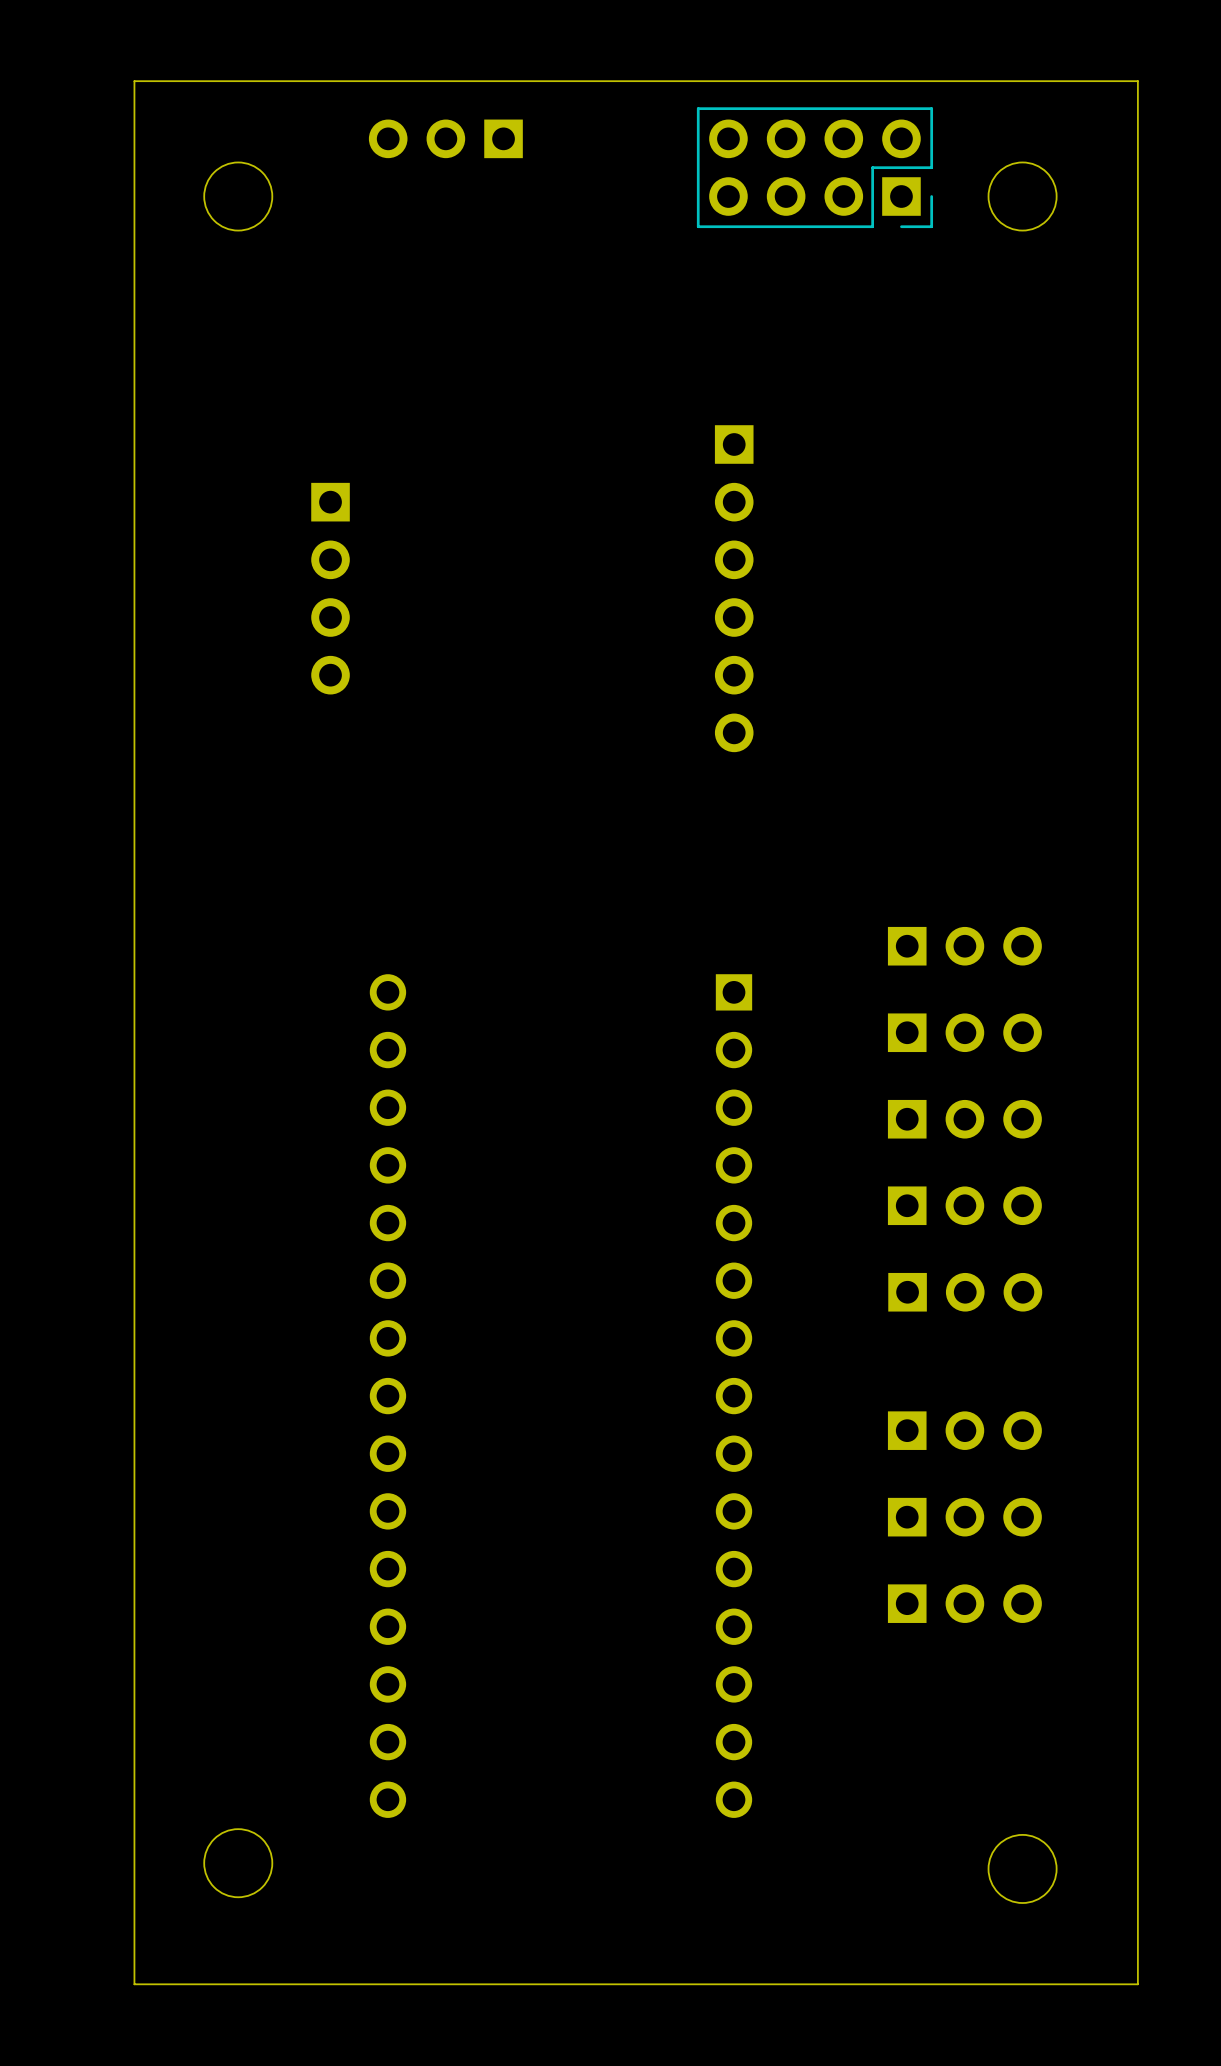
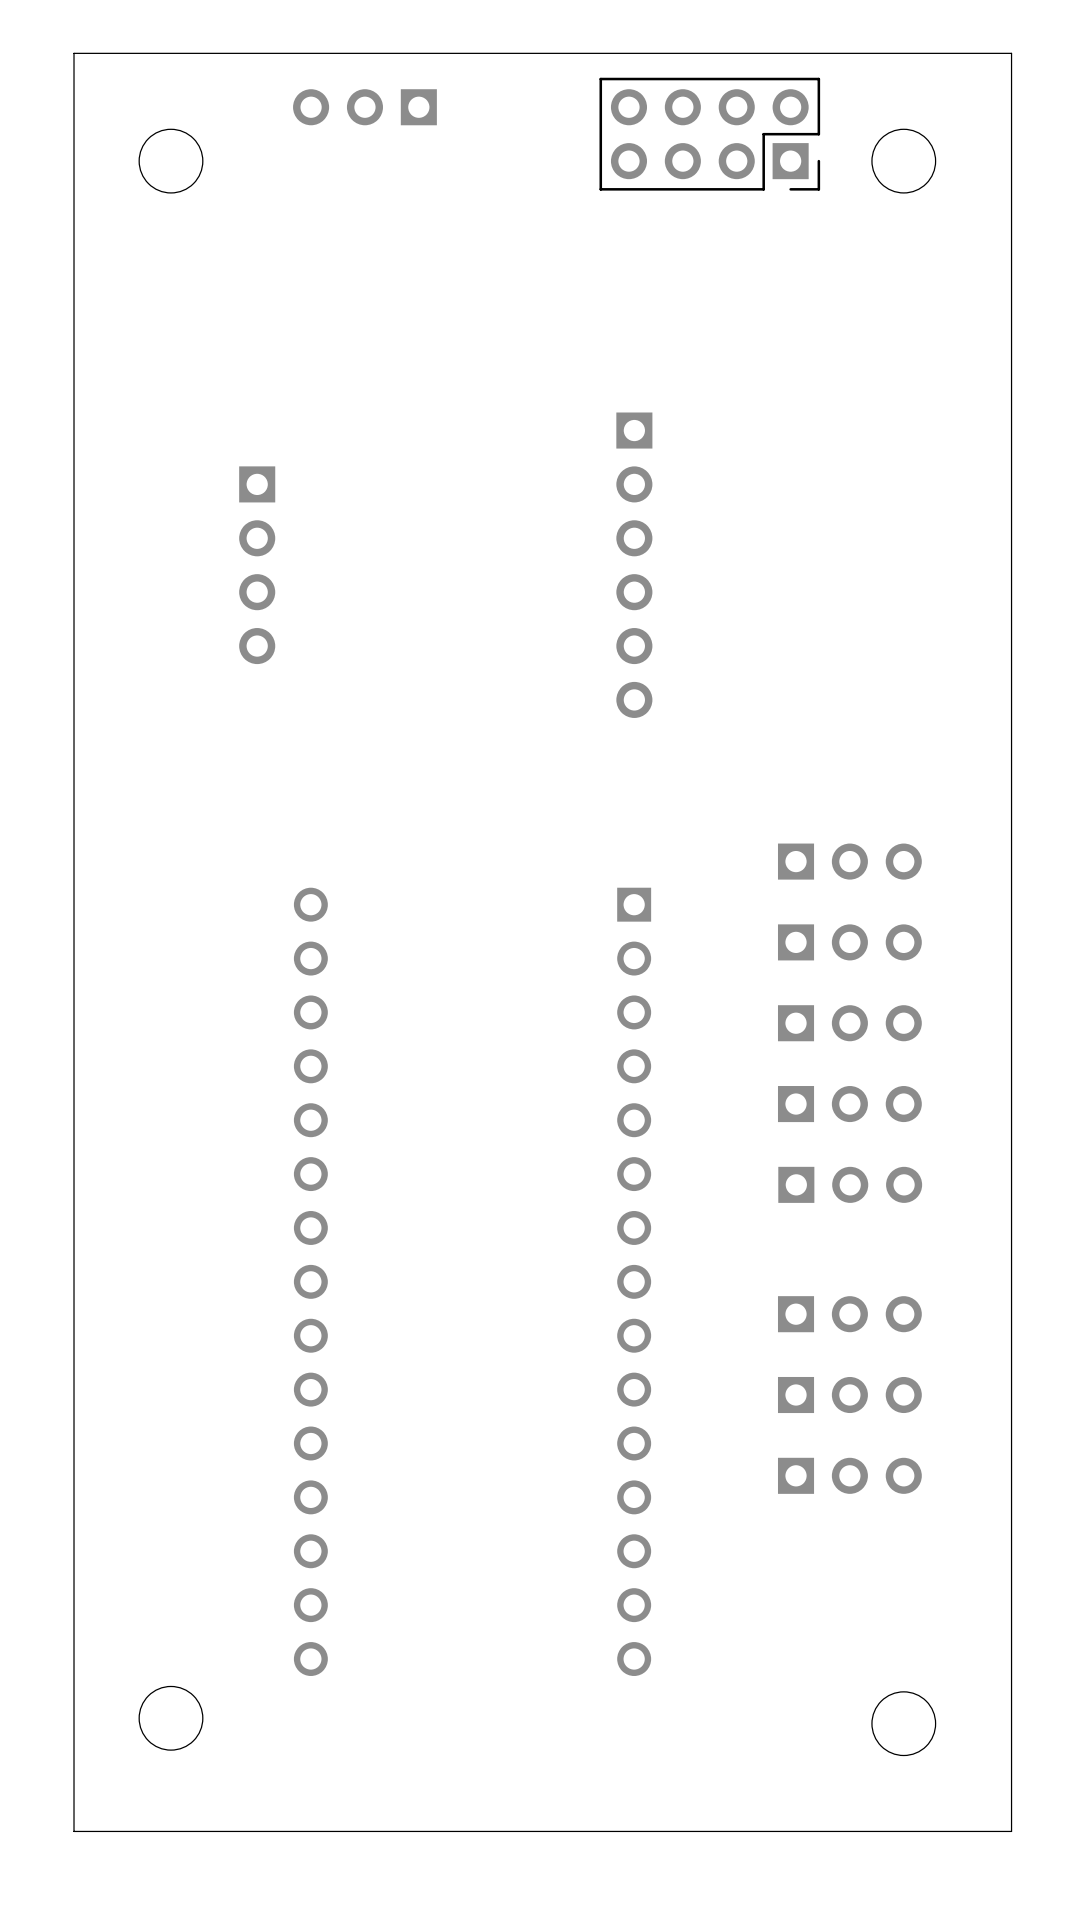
part position: (330, 588) -> (257, 565)
part position: (734, 588) -> (634, 565)

